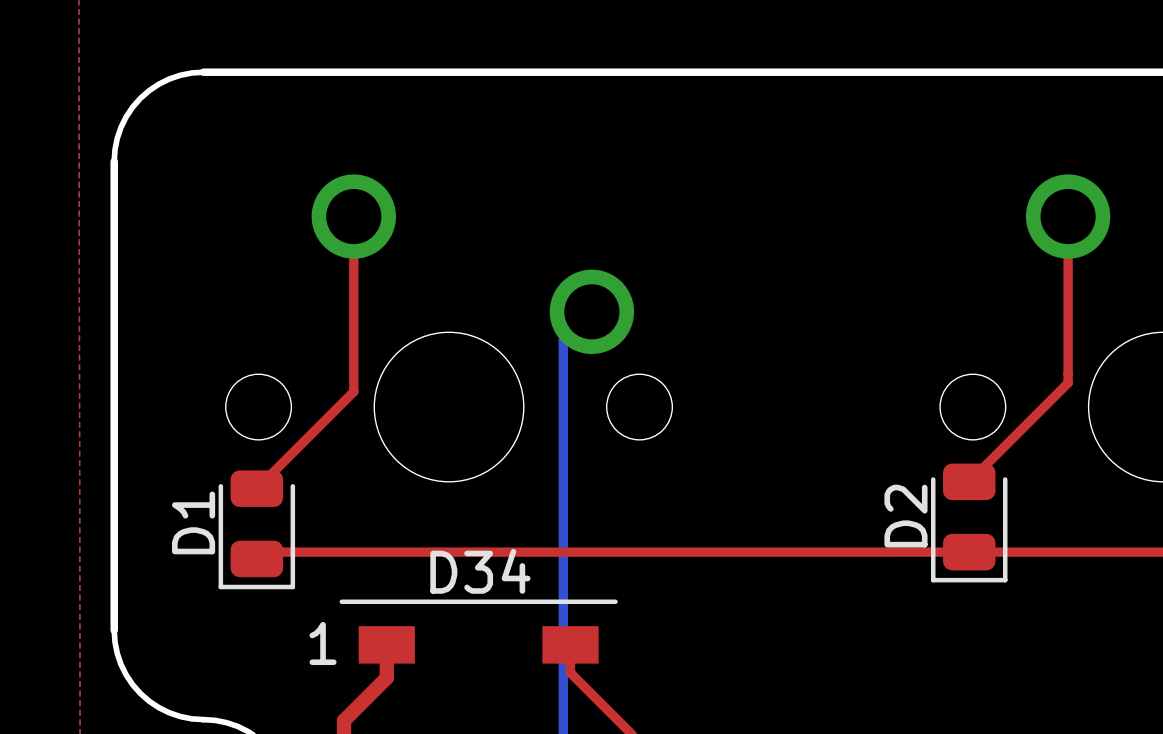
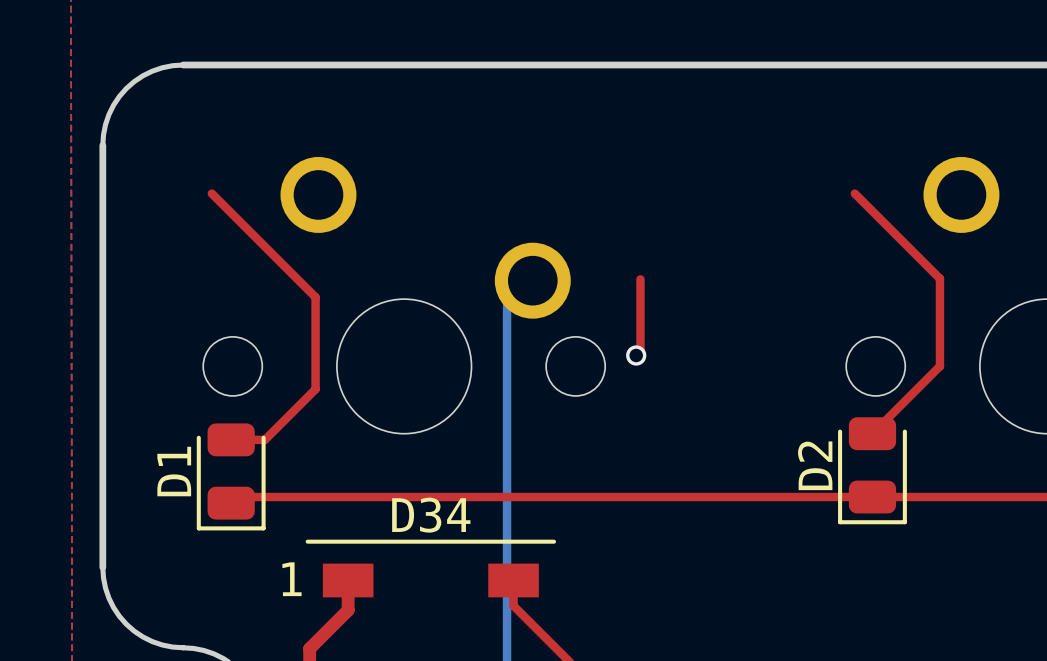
top track: (353, 216) (353, 391) (256, 488) -> (211, 193) (315, 297) (315, 389) (264, 439) (231, 439)
top track: (1068, 216) (1068, 382) (1044, 406) -> (854, 193) (939, 278) (939, 366)
top track: none -> (640, 279) (640, 351) (636, 355)
via: none -> (636, 355)

